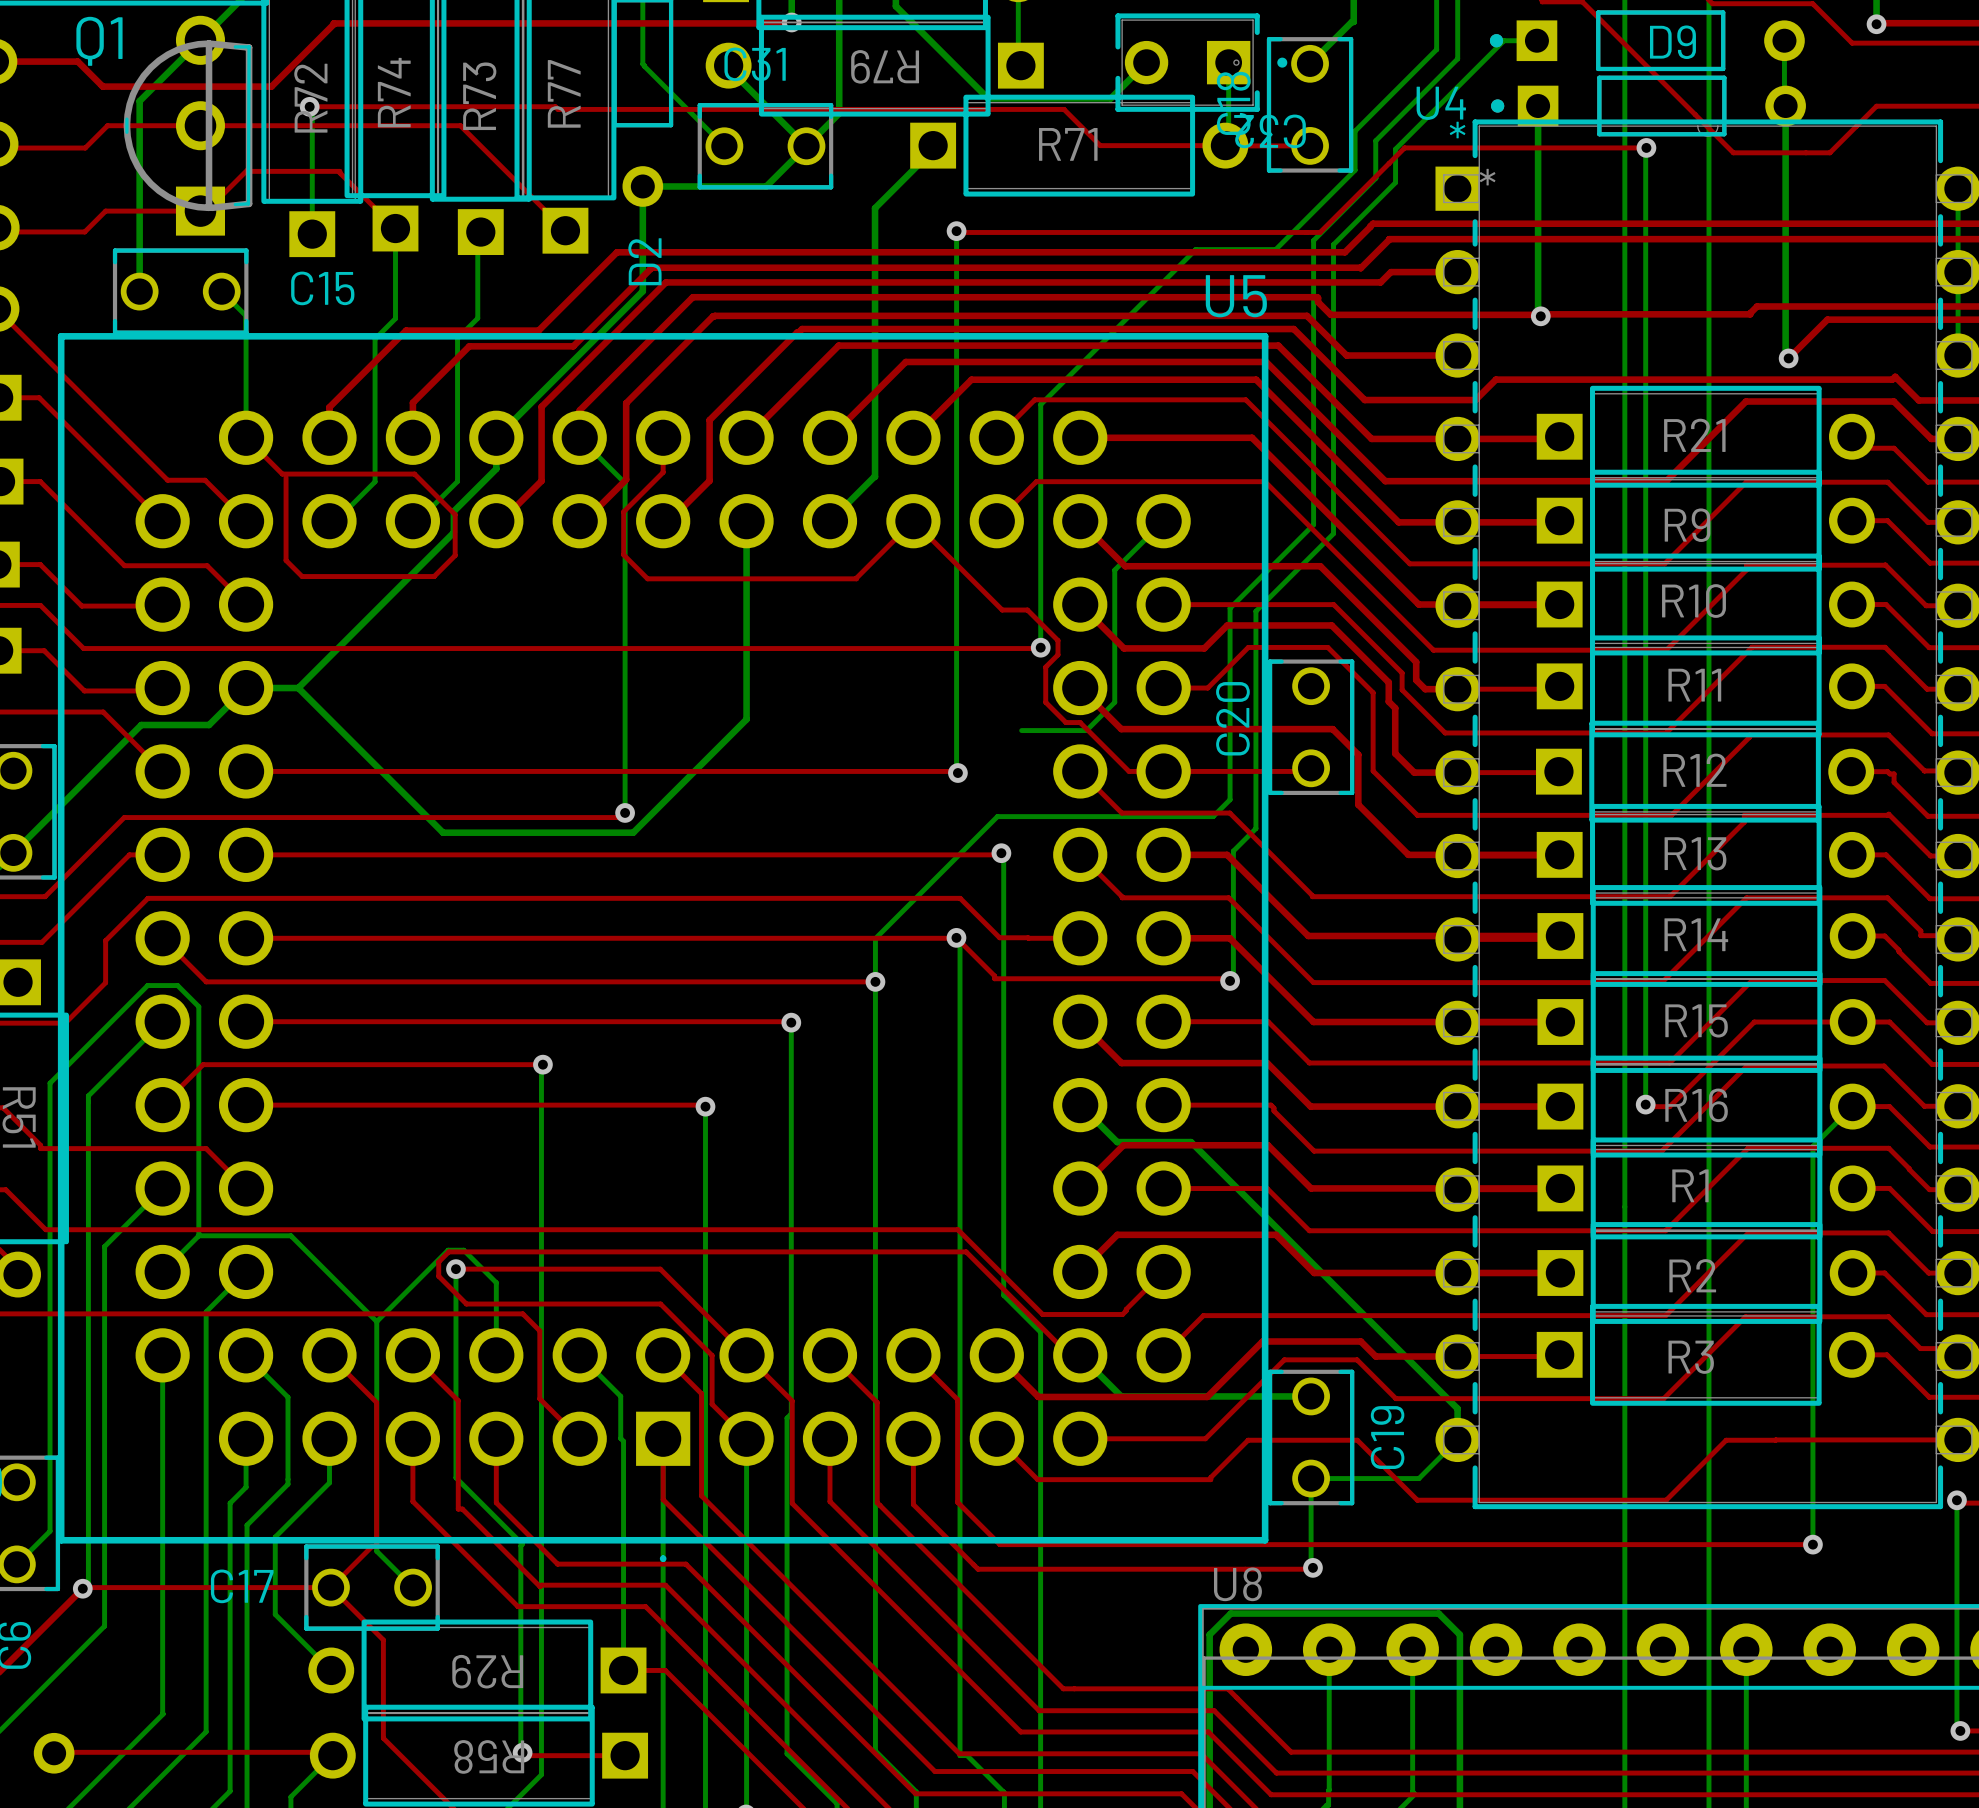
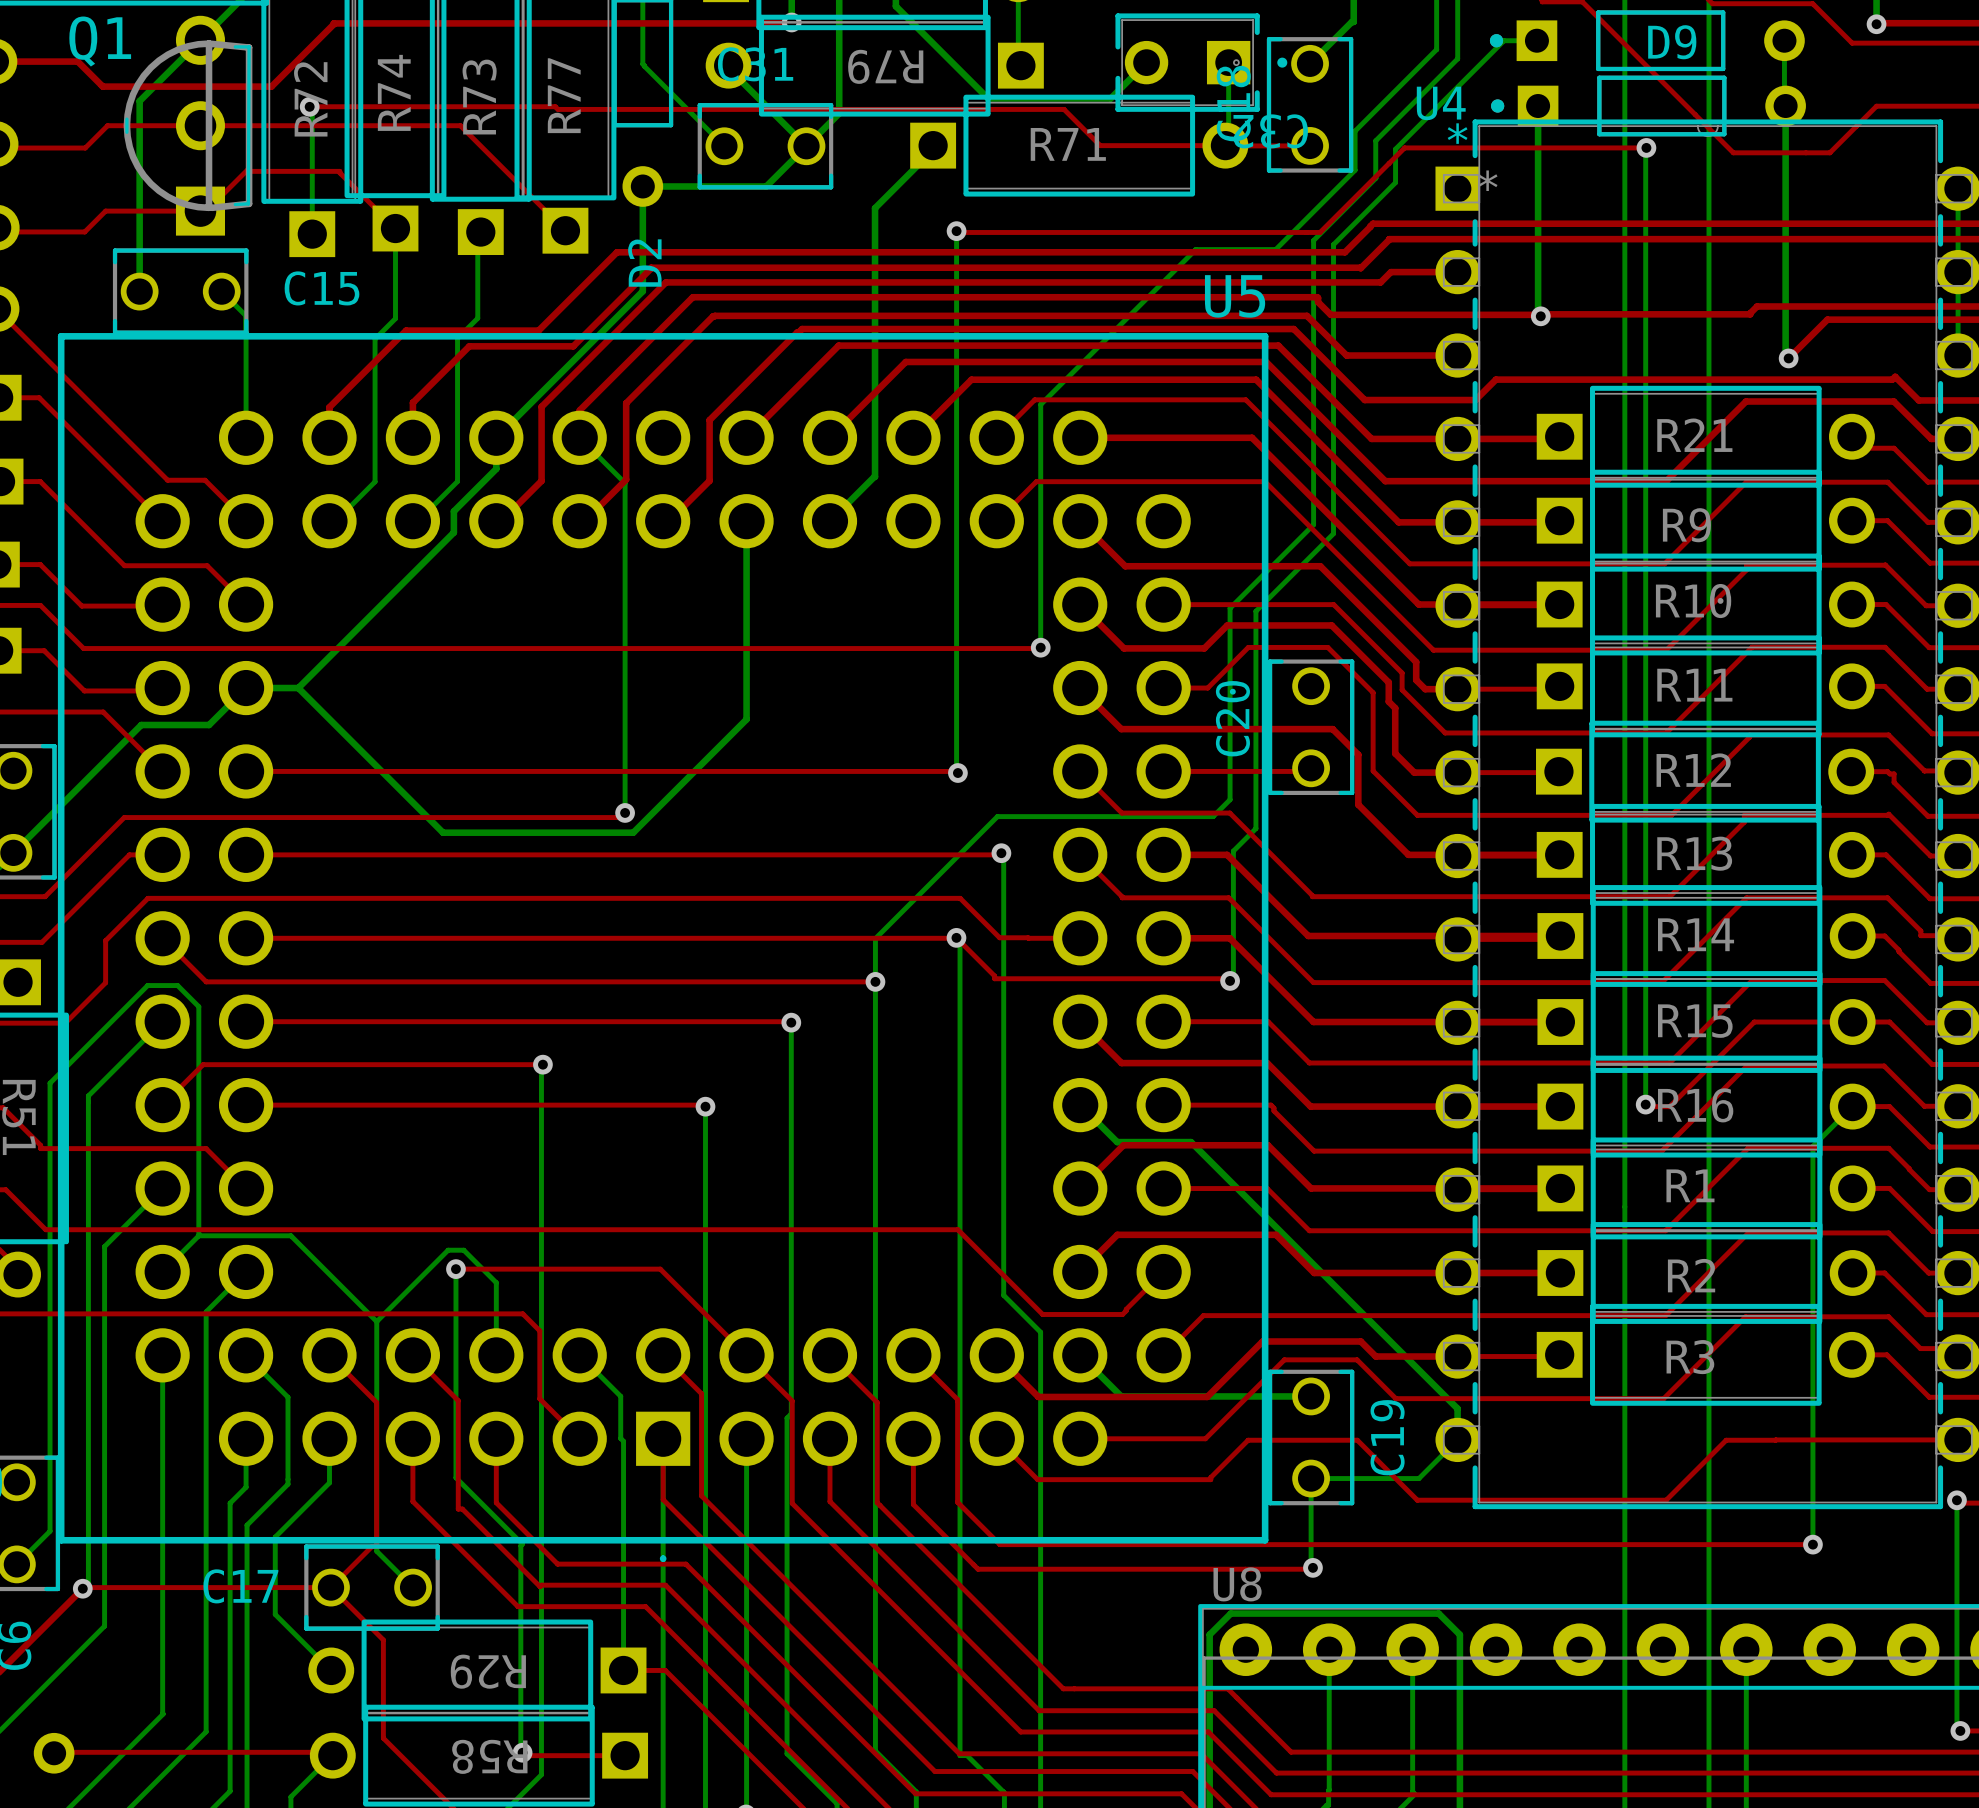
top track: (246, 437) (282, 474) (414, 474) (455, 514) (455, 555) (434, 576) (302, 576) (286, 560) (286, 477) -> none
top track: (663, 437) (663, 472) (623, 511) (623, 554) (647, 578) (856, 578) (913, 521) (1002, 610) (1027, 610) (1057, 640) (1057, 654) (1045, 667) (1045, 702) (1065, 722) (1080, 722) (1129, 771) (1163, 771) -> none
bottom track: (1163, 521) (1114, 570) (1114, 702) (1086, 730) (1021, 730) -> none
top track: (1080, 1355) (1069, 1355) (966, 1251) (448, 1251) (438, 1261) (438, 1276) (466, 1304) (660, 1304) (712, 1355) (712, 1404) (746, 1438) -> none

